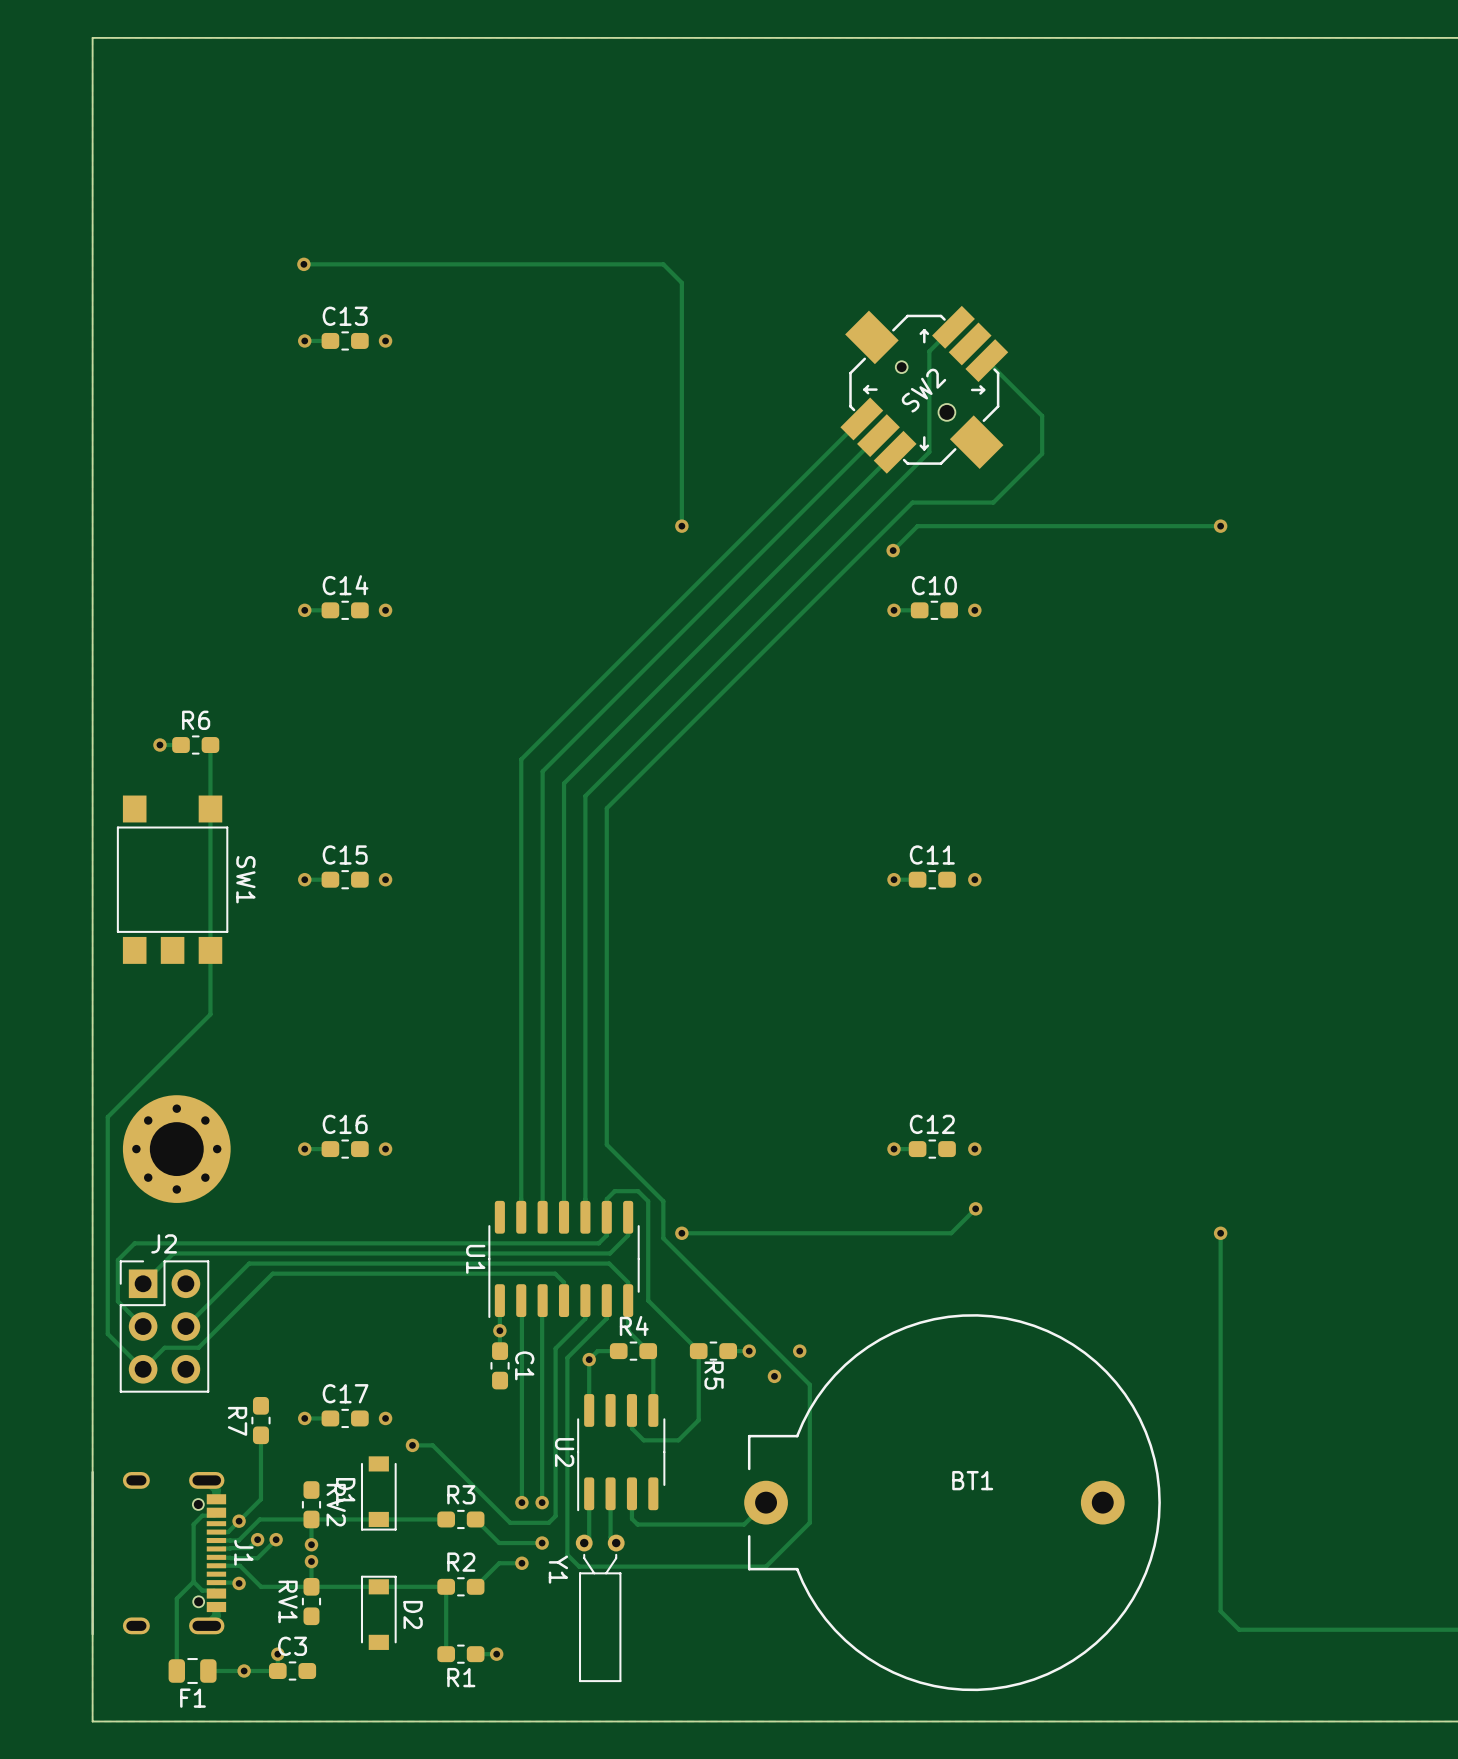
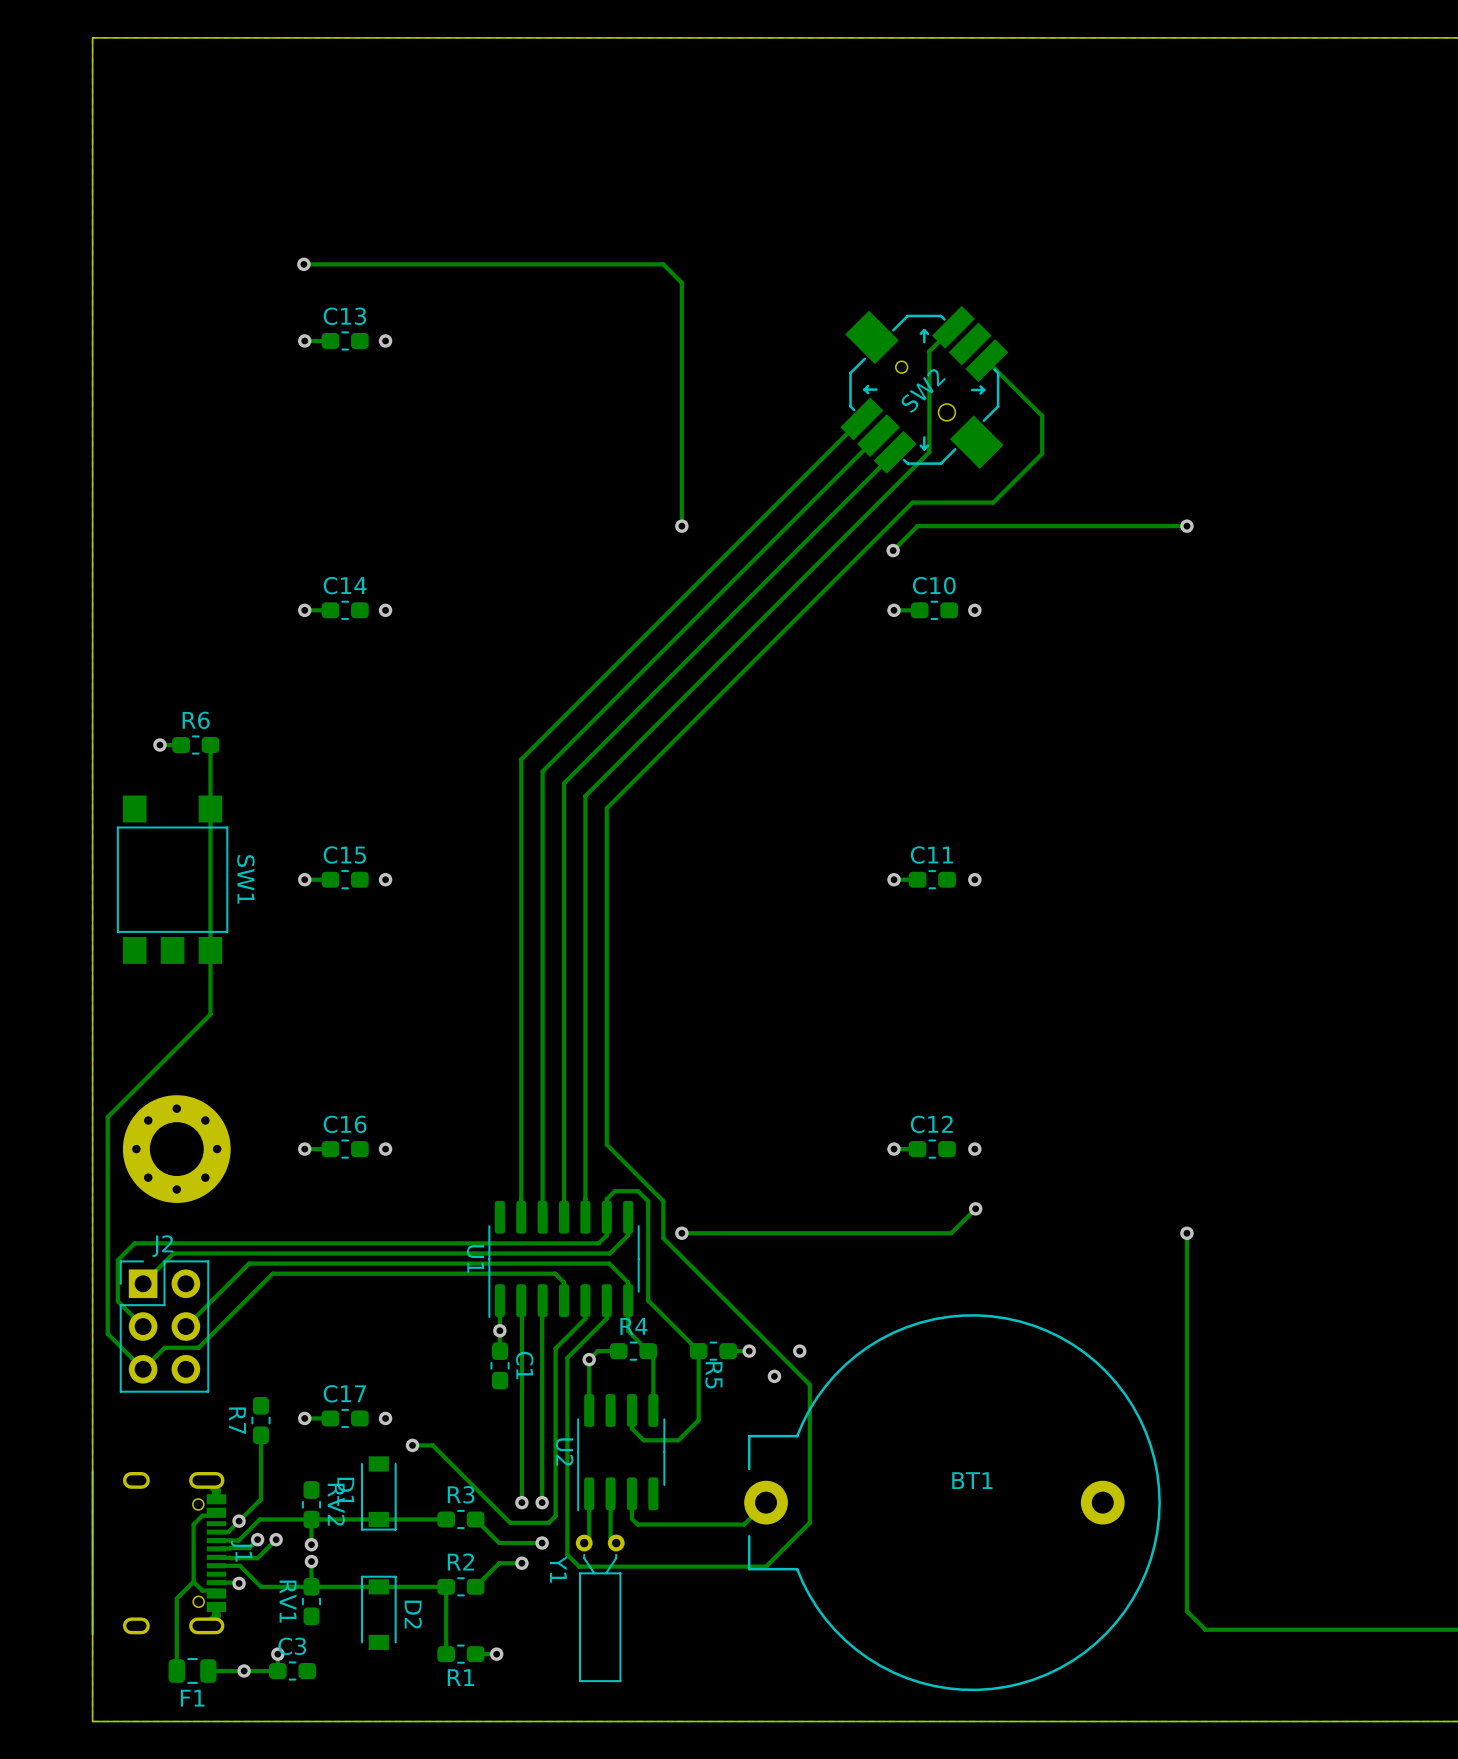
track: (1220, 526) (1186, 526) -> none
via position: (1220, 526) -> (1186, 526)
track: (1220, 1233) (1220, 1611) (1239, 1629) -> (1186, 1233) (1186, 1611) (1205, 1629) (1239, 1629)
via position: (1220, 1233) -> (1186, 1233)

